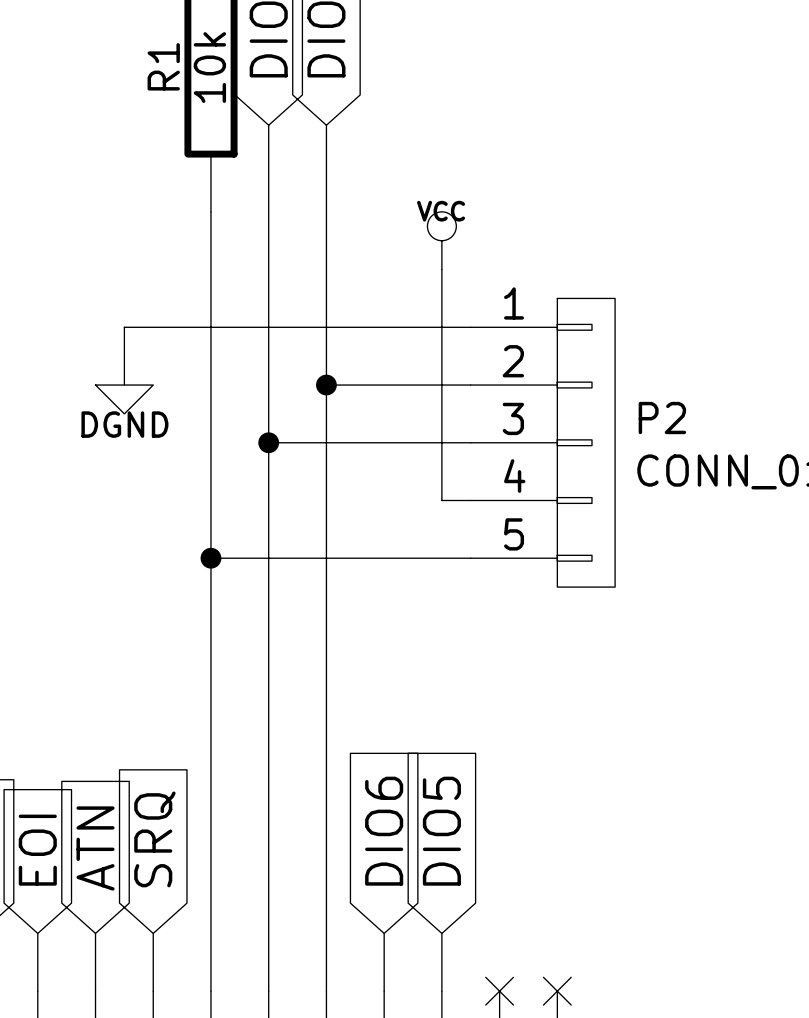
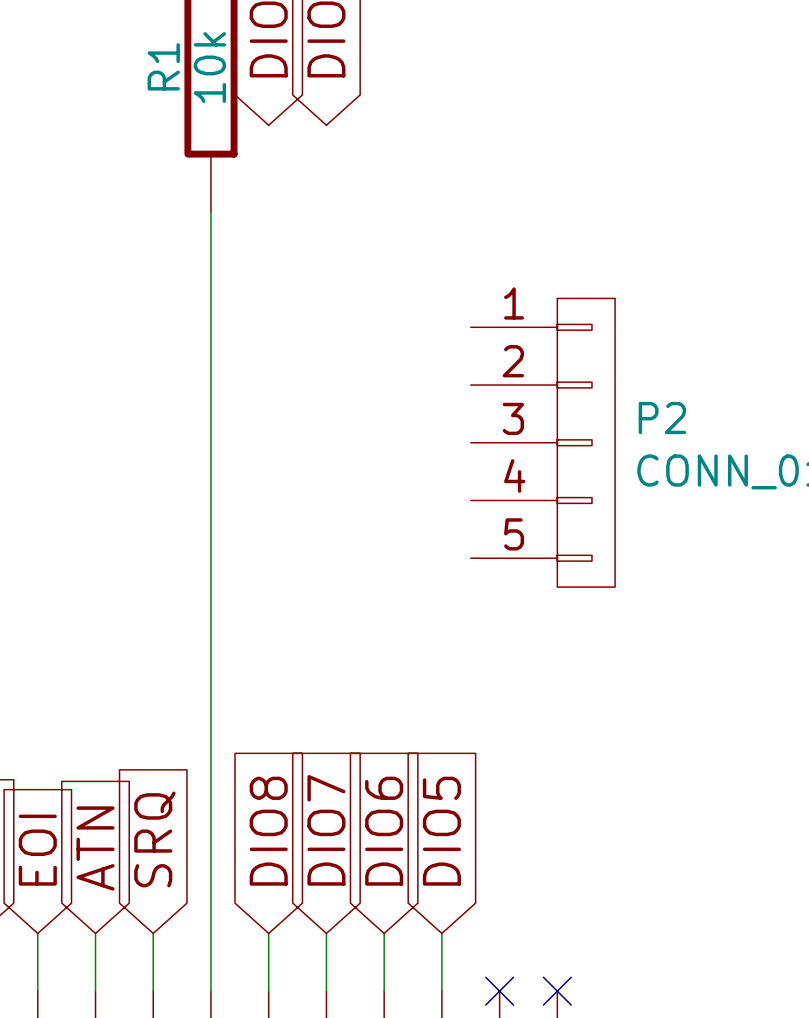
wire: (268, 125) (268, 933) -> none
wire: (326, 125) (326, 933) -> none
power symbol: VCC (441, 240) -> none
wire: (441, 269) (441, 500) (470, 500) -> none
wire: (470, 327) (124, 327) (124, 385) -> none
wire: (326, 385) (470, 385) -> none
junction: (326, 385) -> none
power symbol: DGND (124, 399) -> none
wire: (268, 442) (470, 442) -> none
junction: (268, 442) -> none
wire: (210, 558) (470, 558) -> none
junction: (210, 558) -> none
global label: none -> DIO7 (326, 830)
global label: none -> DIO8 (268, 831)

